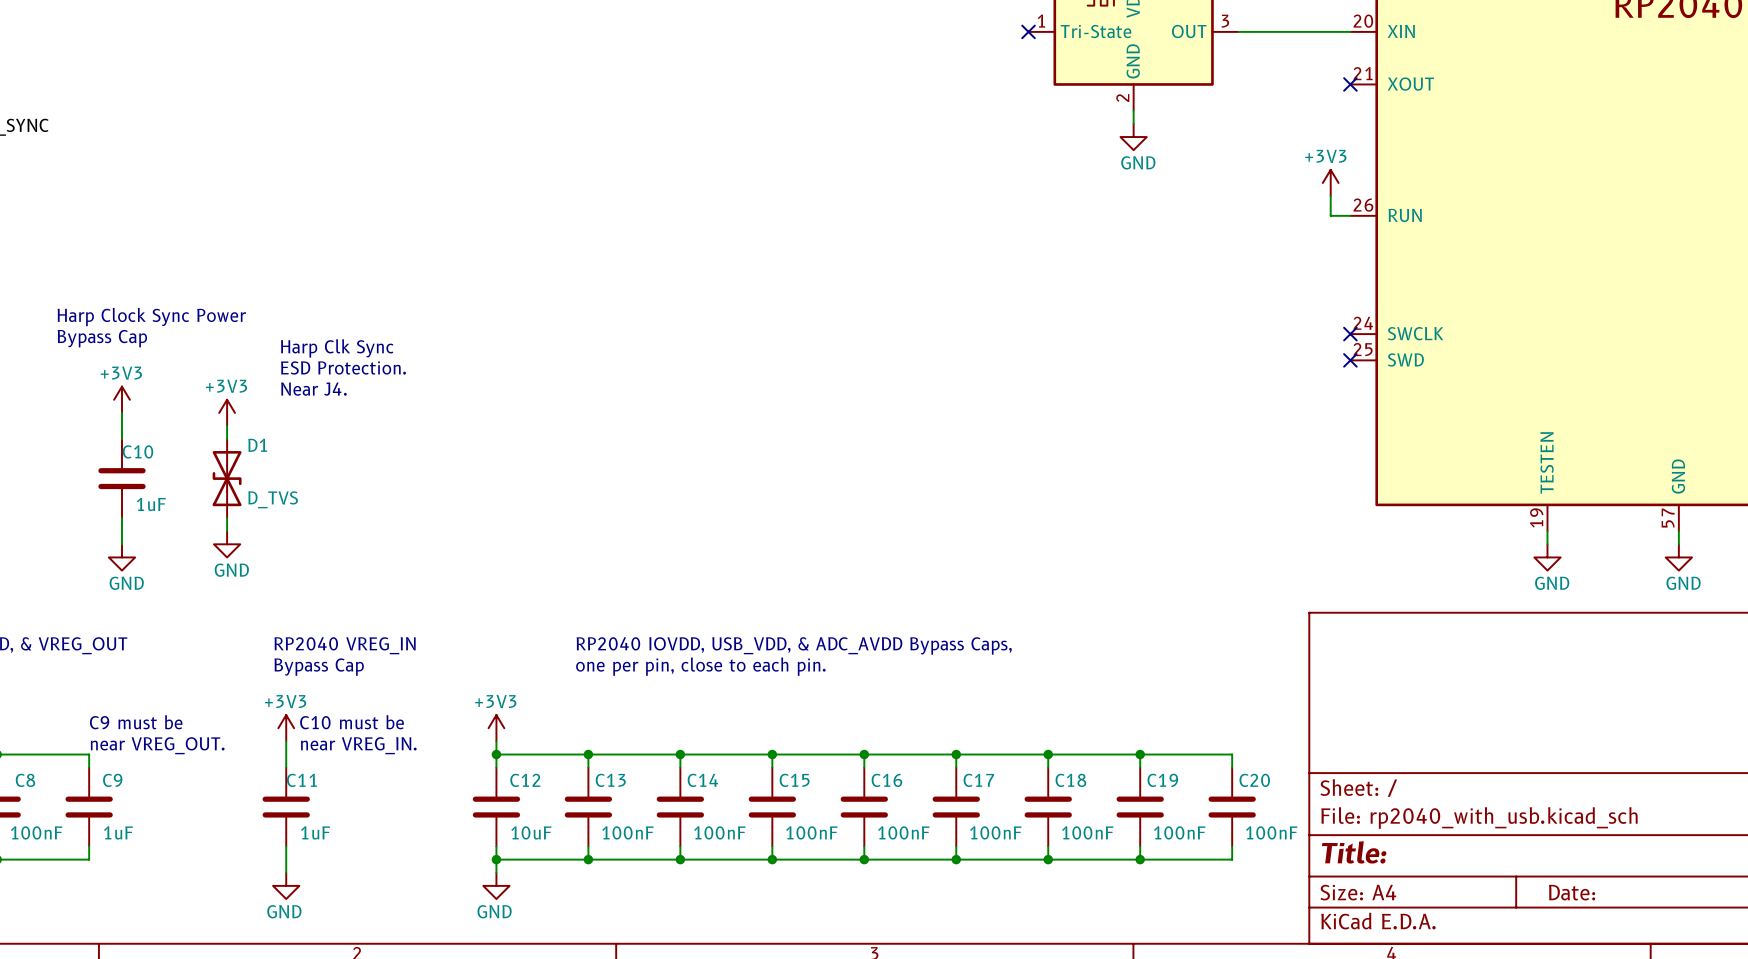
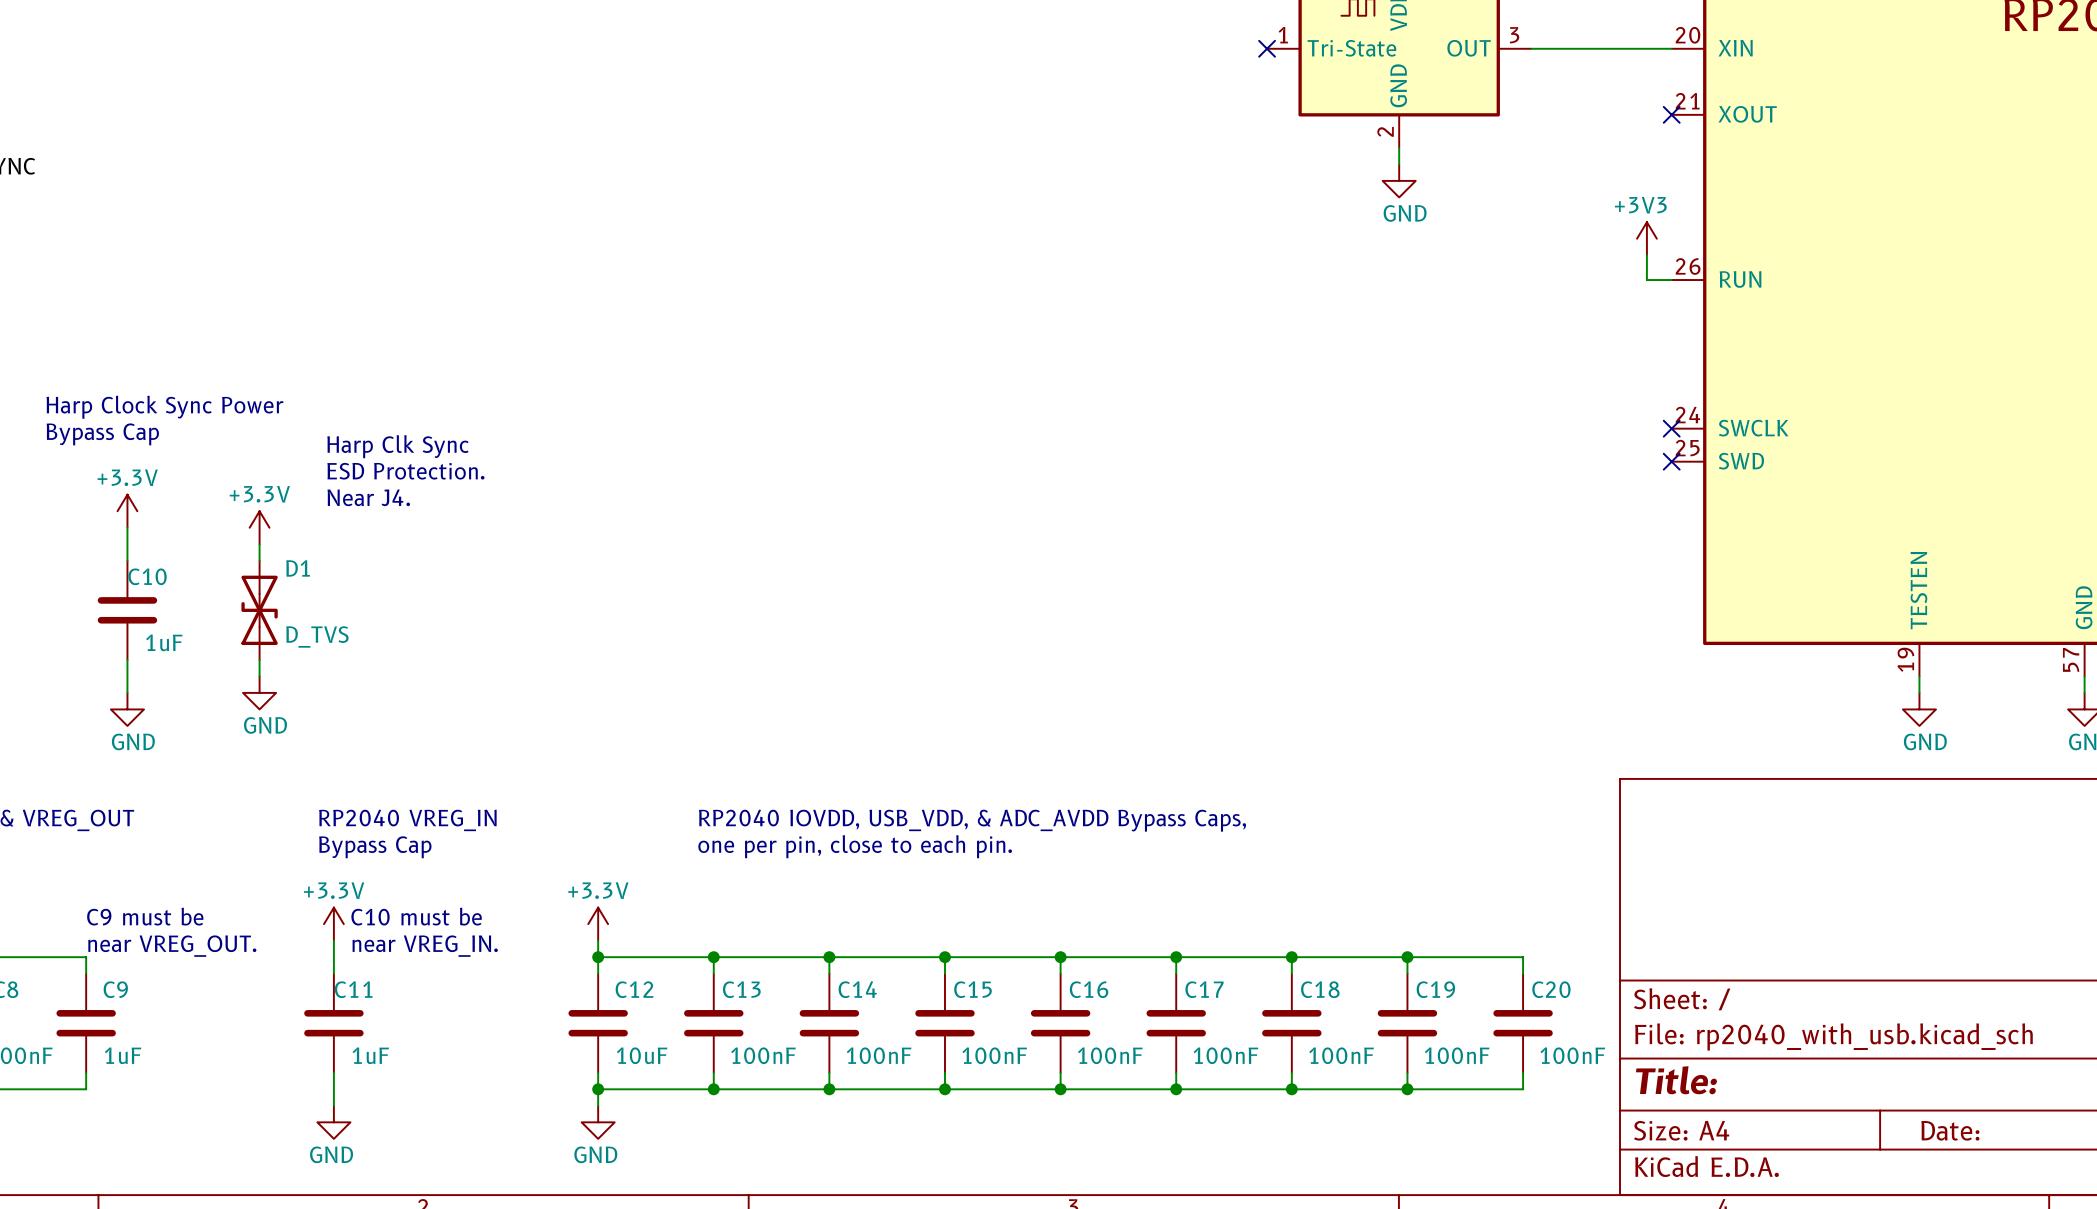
power symbol: +3V3 (122, 399) -> +3.3V (127, 511)
power symbol: +3V3 (227, 412) -> +3.3V (259, 527)
power symbol: +3V3 (286, 728) -> +3.3V (333, 924)
power symbol: +3V3 (496, 728) -> +3.3V (598, 924)

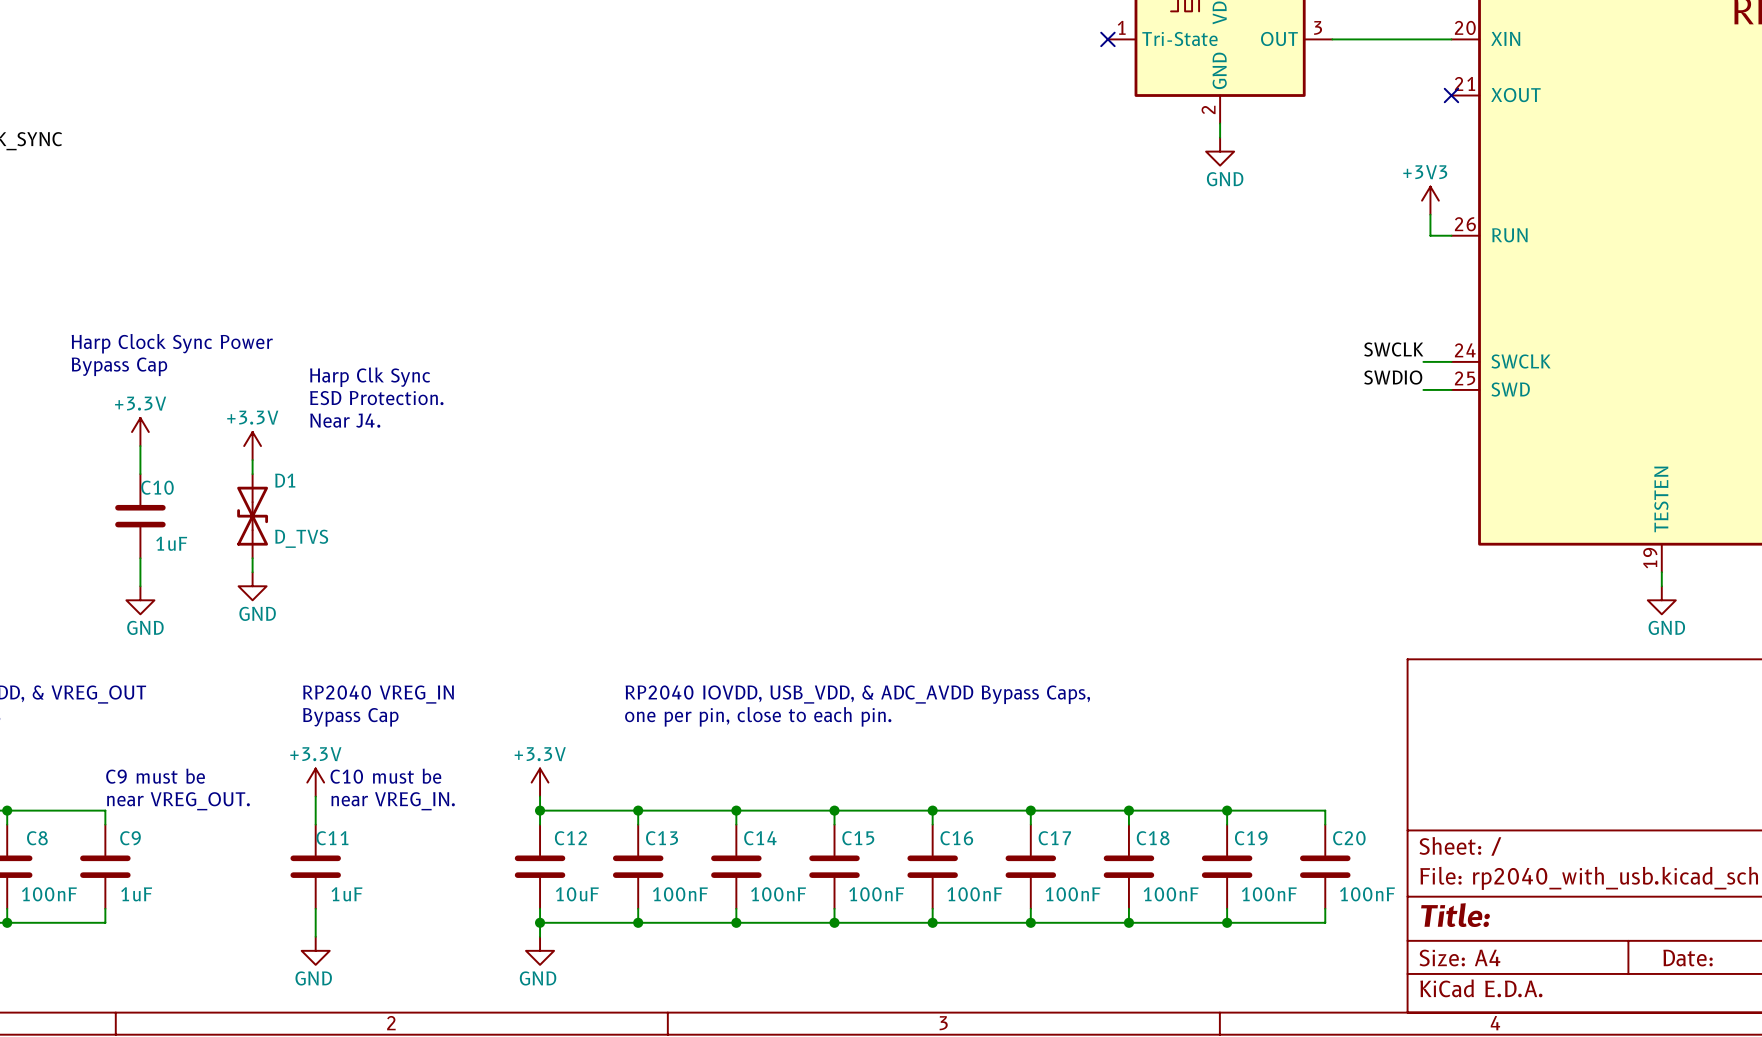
label: none -> SWCLK (1393, 349)
wire: none -> (1423, 361) (1451, 361)
no-connect mark: (1671, 428) -> none
label: none -> SWDIO (1393, 377)
wire: none -> (1423, 389) (1451, 389)
no-connect mark: (1671, 461) -> none

